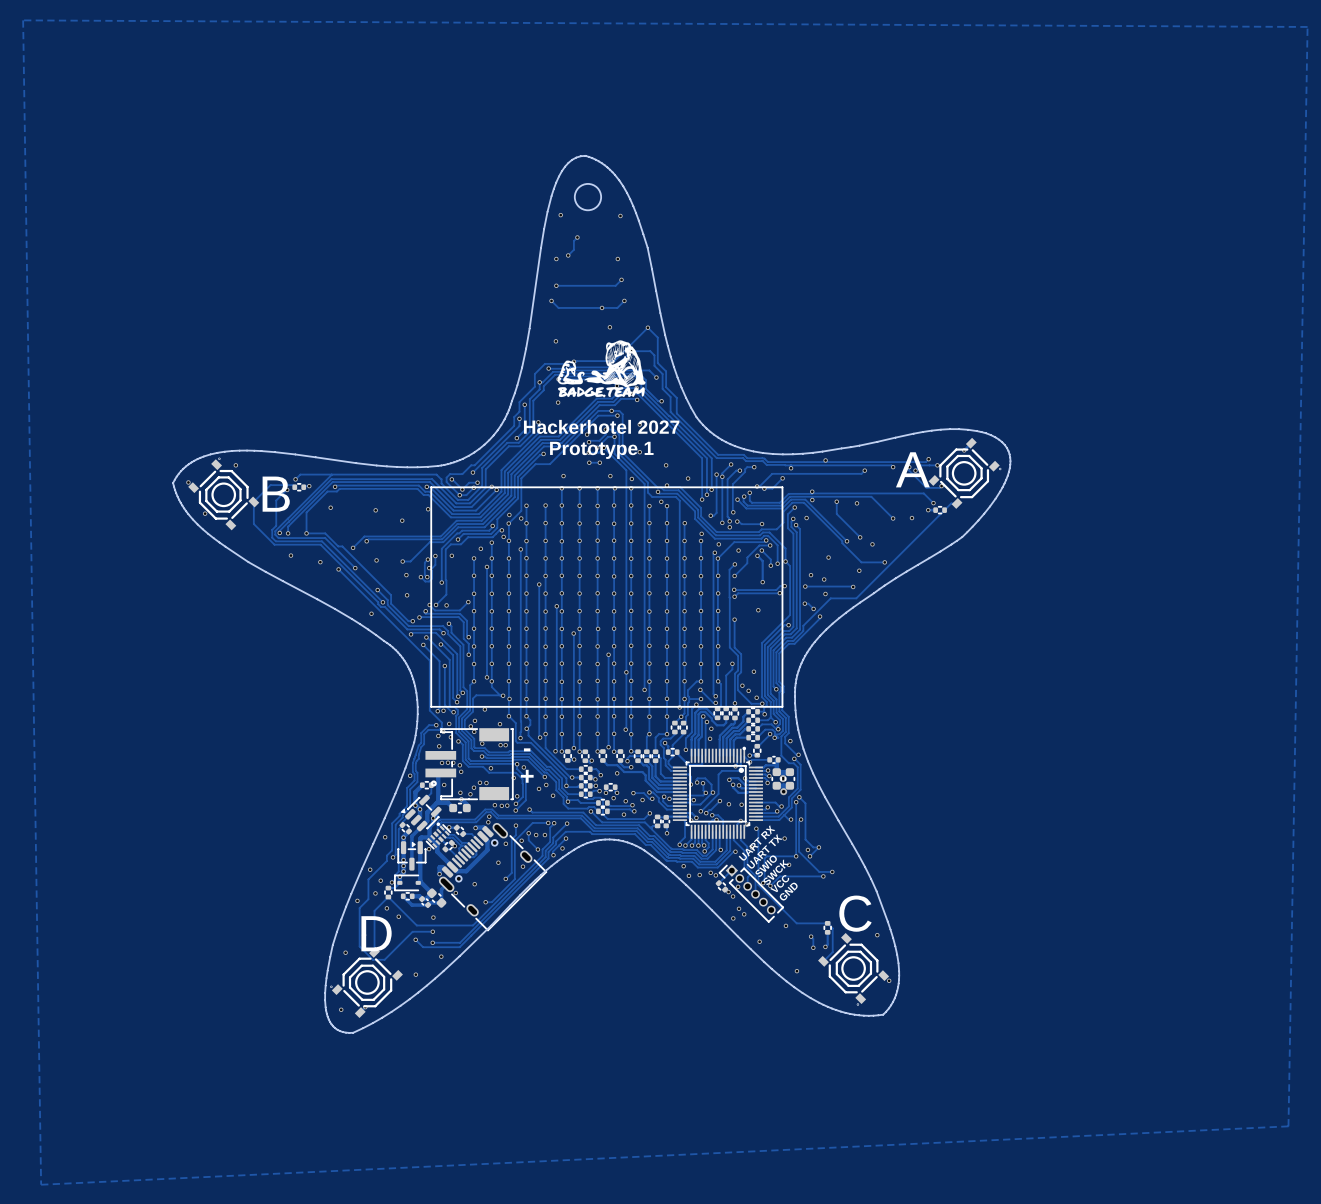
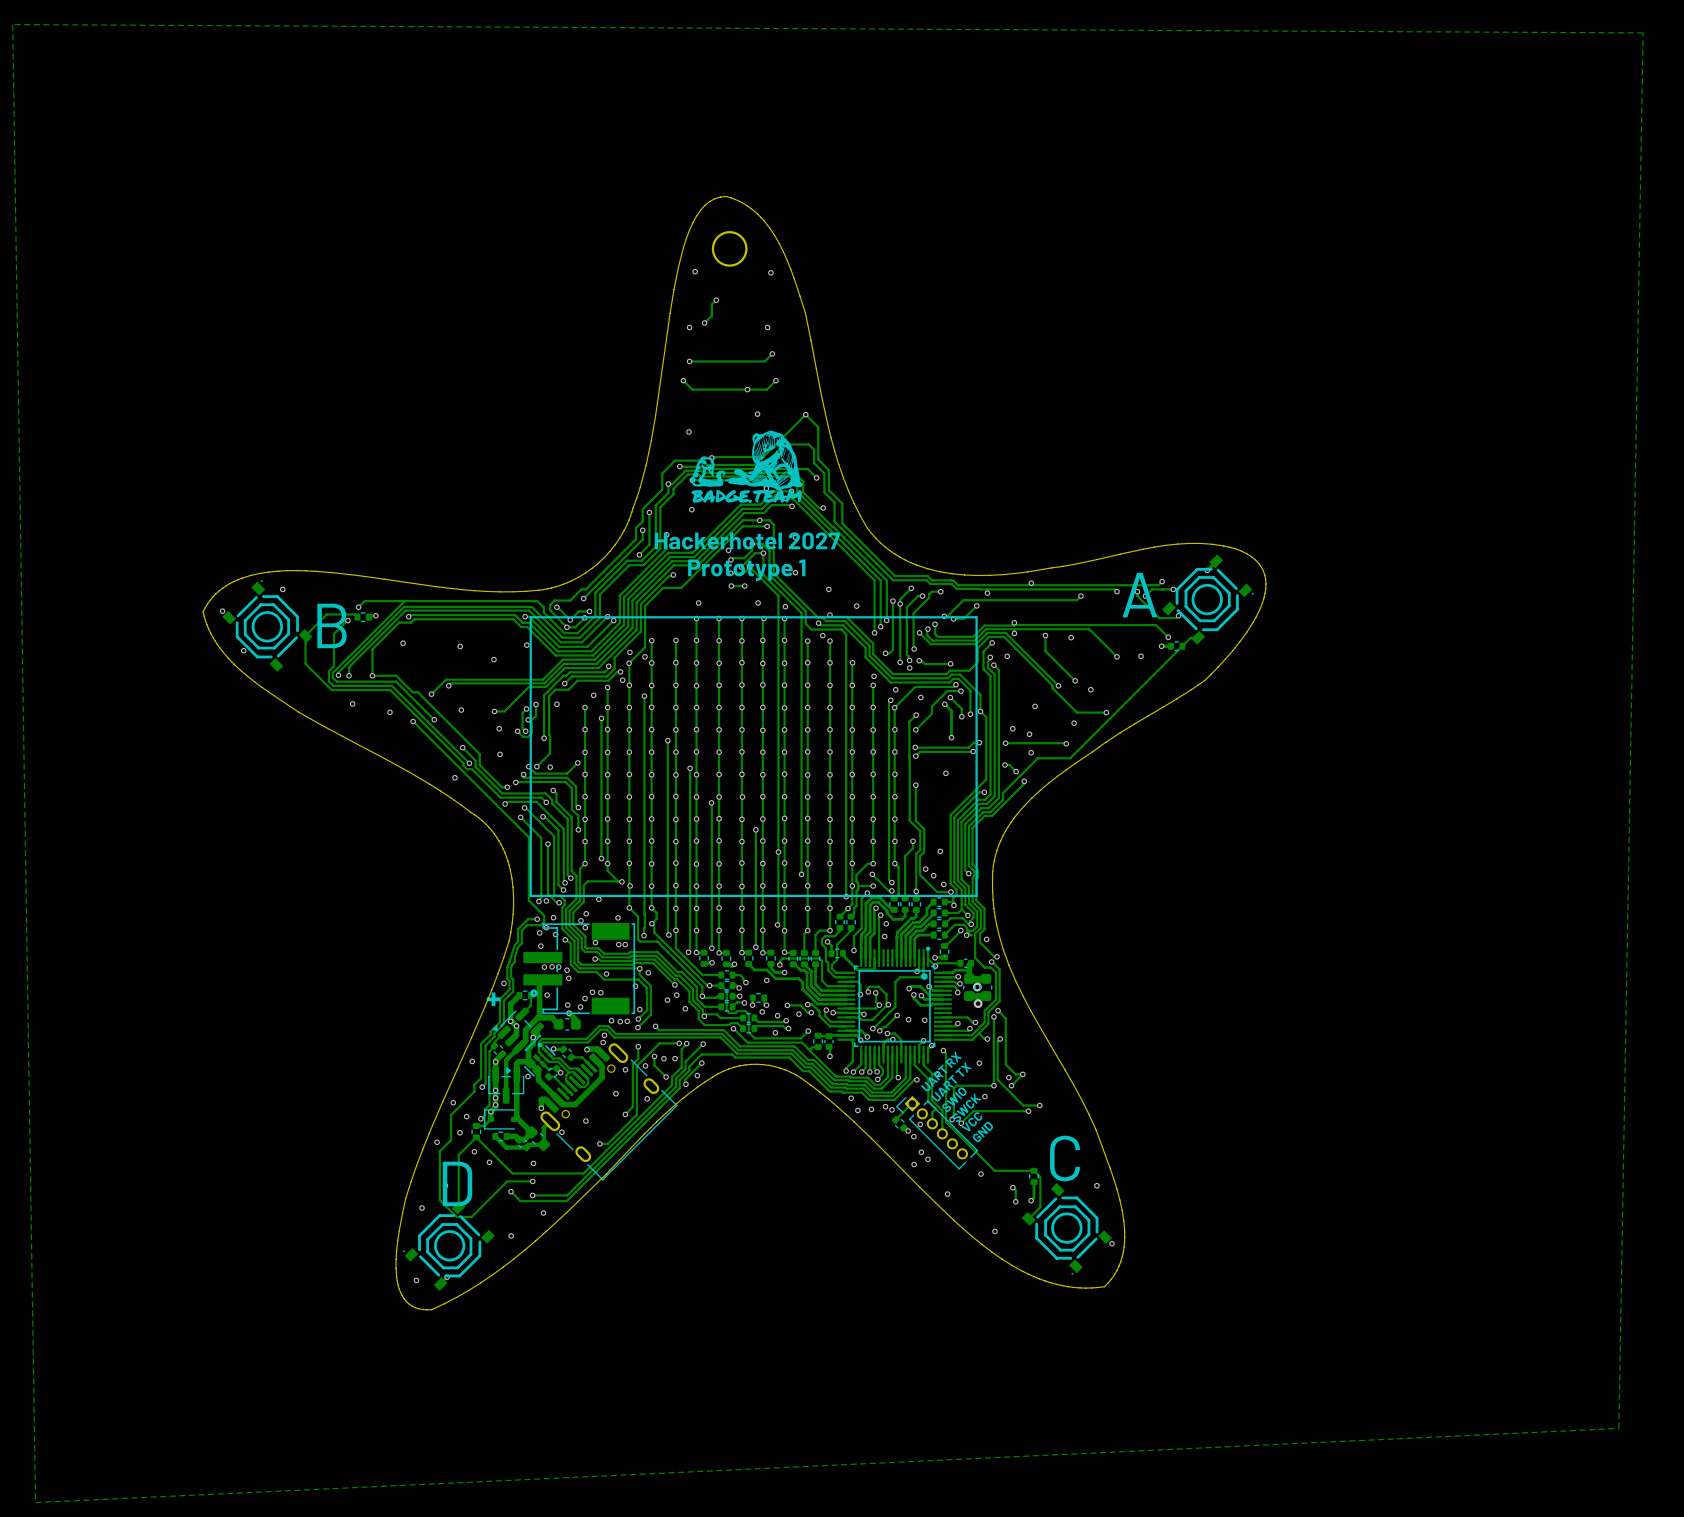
text: - (527, 749) -> none
text position: + (527, 776) -> + (493, 999)

